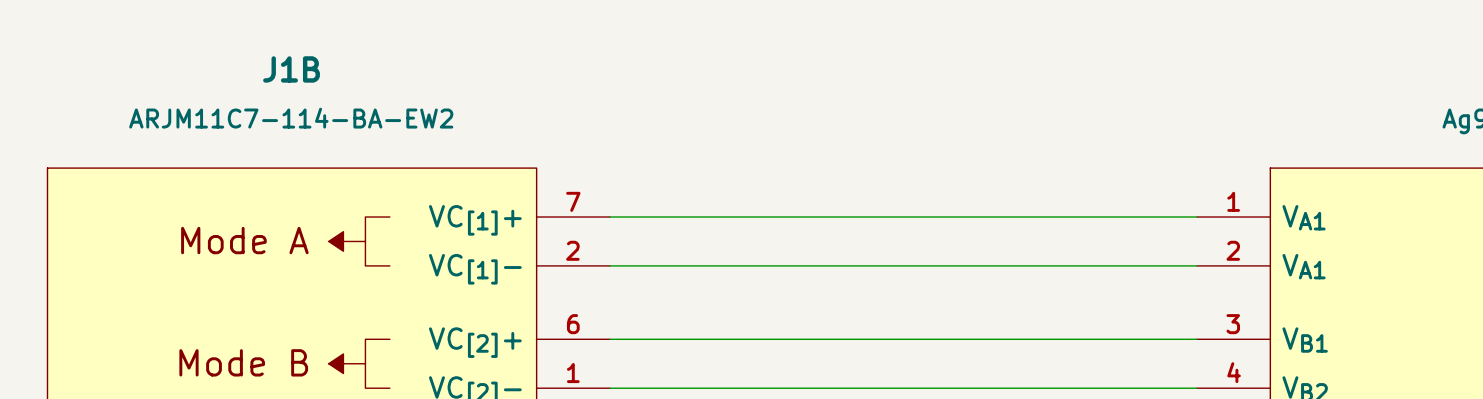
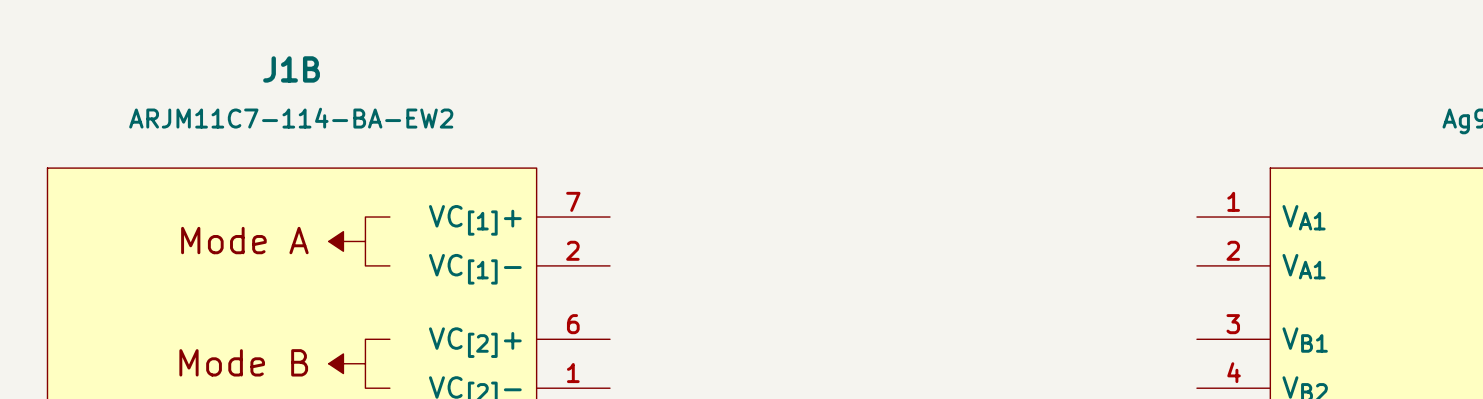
wire: (609, 217) (1196, 217) -> none
wire: (609, 265) (1196, 265) -> none
wire: (609, 339) (1196, 339) -> none
wire: (609, 388) (1196, 388) -> none

